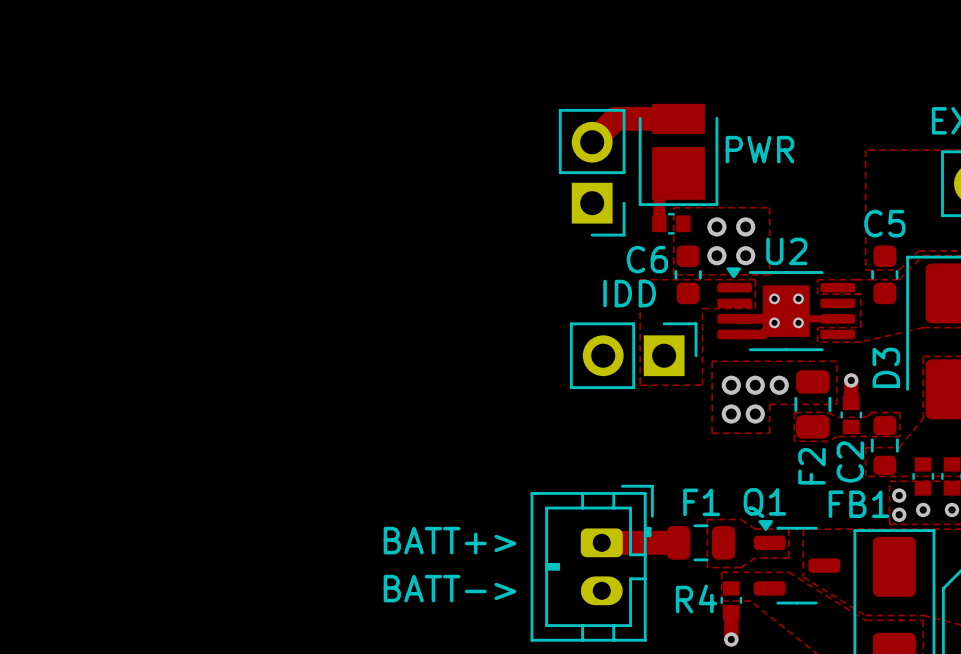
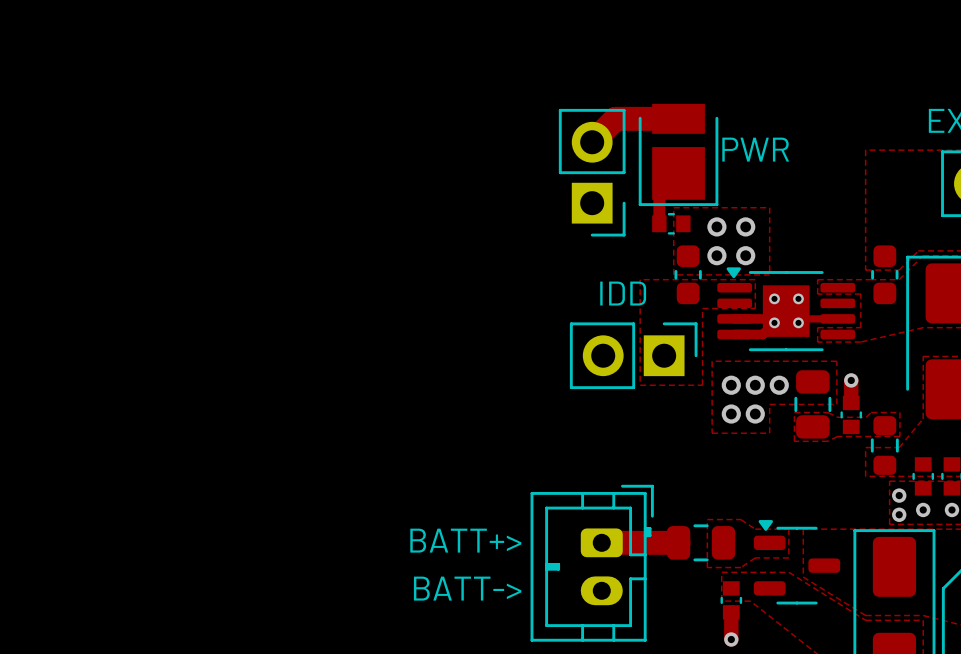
C5 name: C5 (884, 223) -> none
U2 name: U2 (786, 251) -> none
C6 name: C6 (647, 259) -> none
D3 name: D3 (886, 367) -> none
C2 name: C2 (850, 461) -> none
F2 name: F2 (811, 466) -> none
F1 name: F1 (701, 502) -> none
Q1 name: Q1 (764, 503) -> none
FB1 name: FB1 (859, 504) -> none
R4 name: R4 (696, 598) -> none

